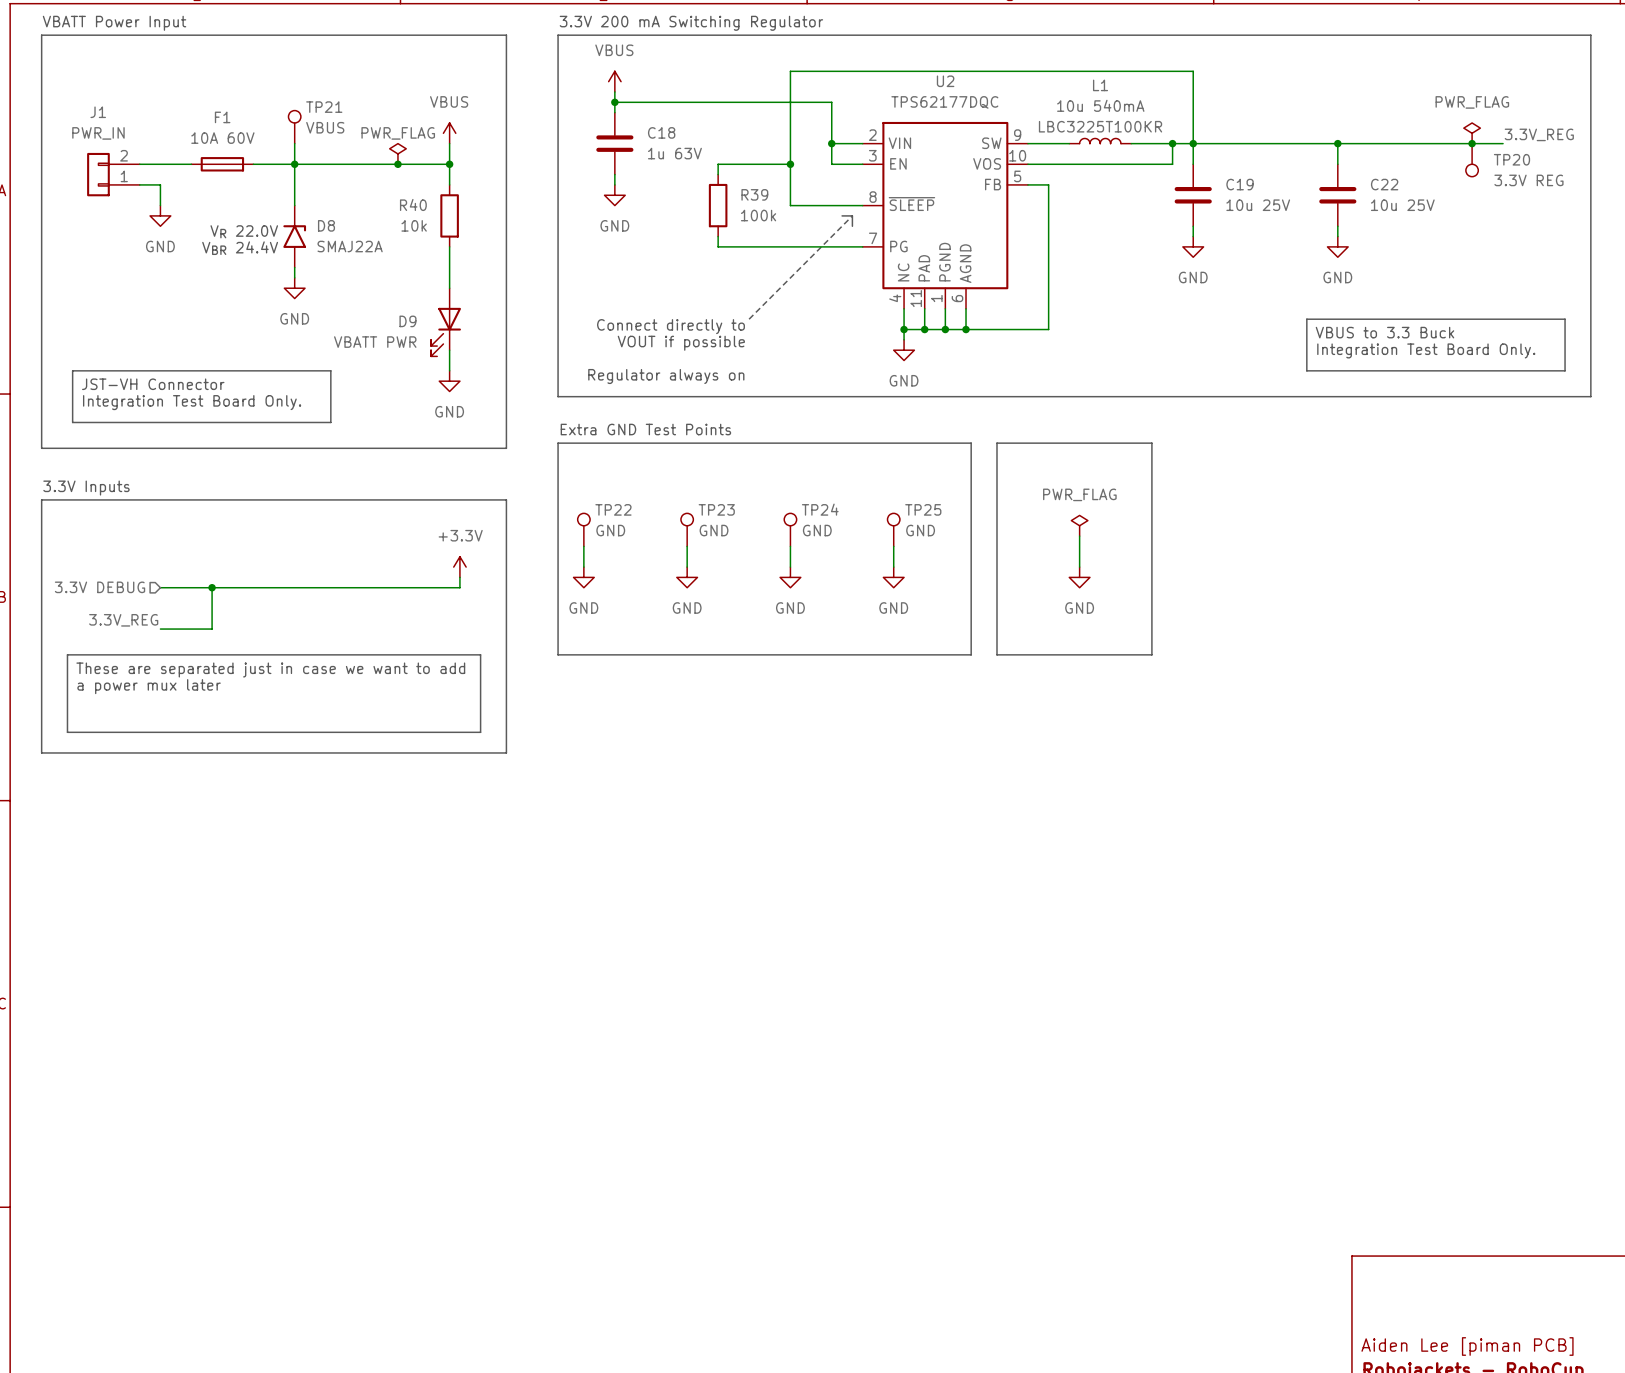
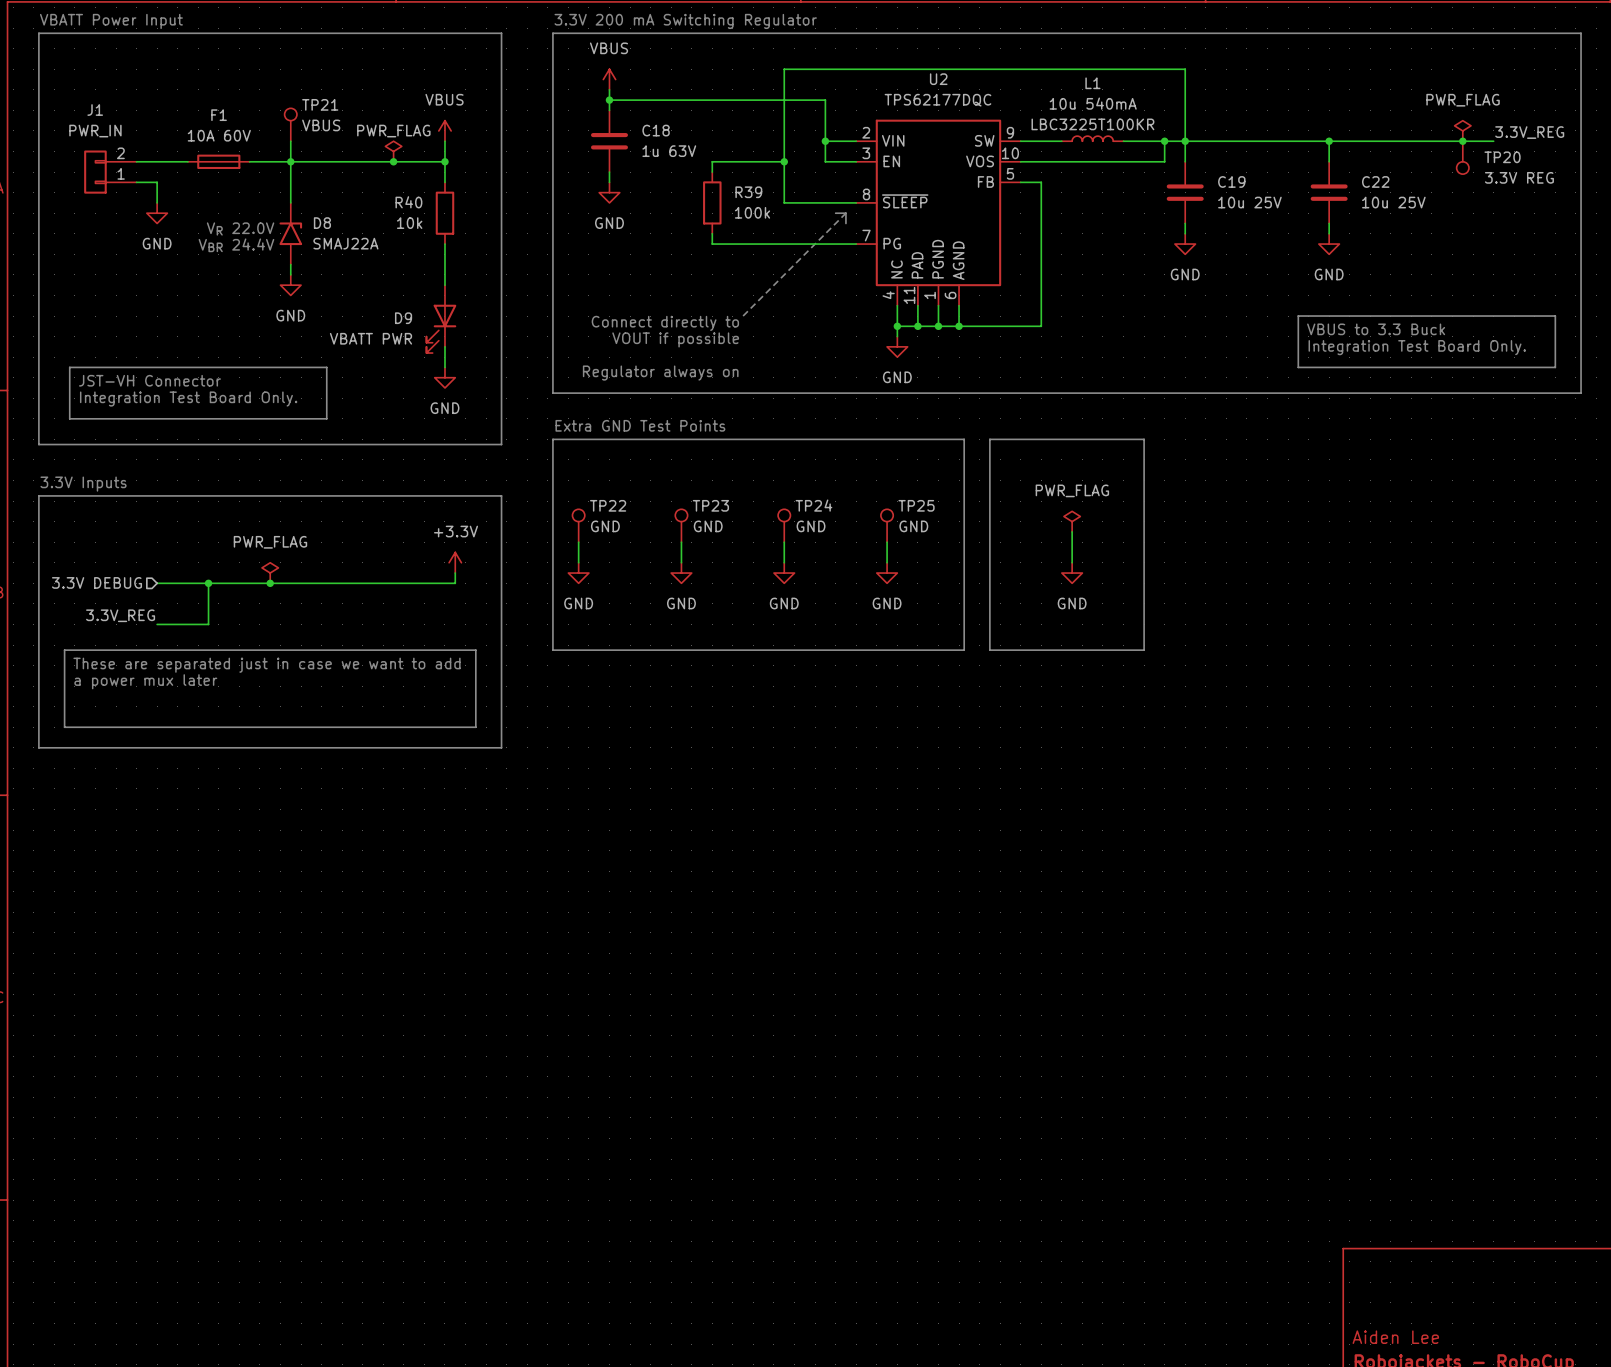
power symbol: none -> PWR_FLAG (270, 573)
junction: none -> (270, 583)
title block: Aiden Lee [piman PCB] (1467, 1346) -> Aiden Lee (1395, 1337)

